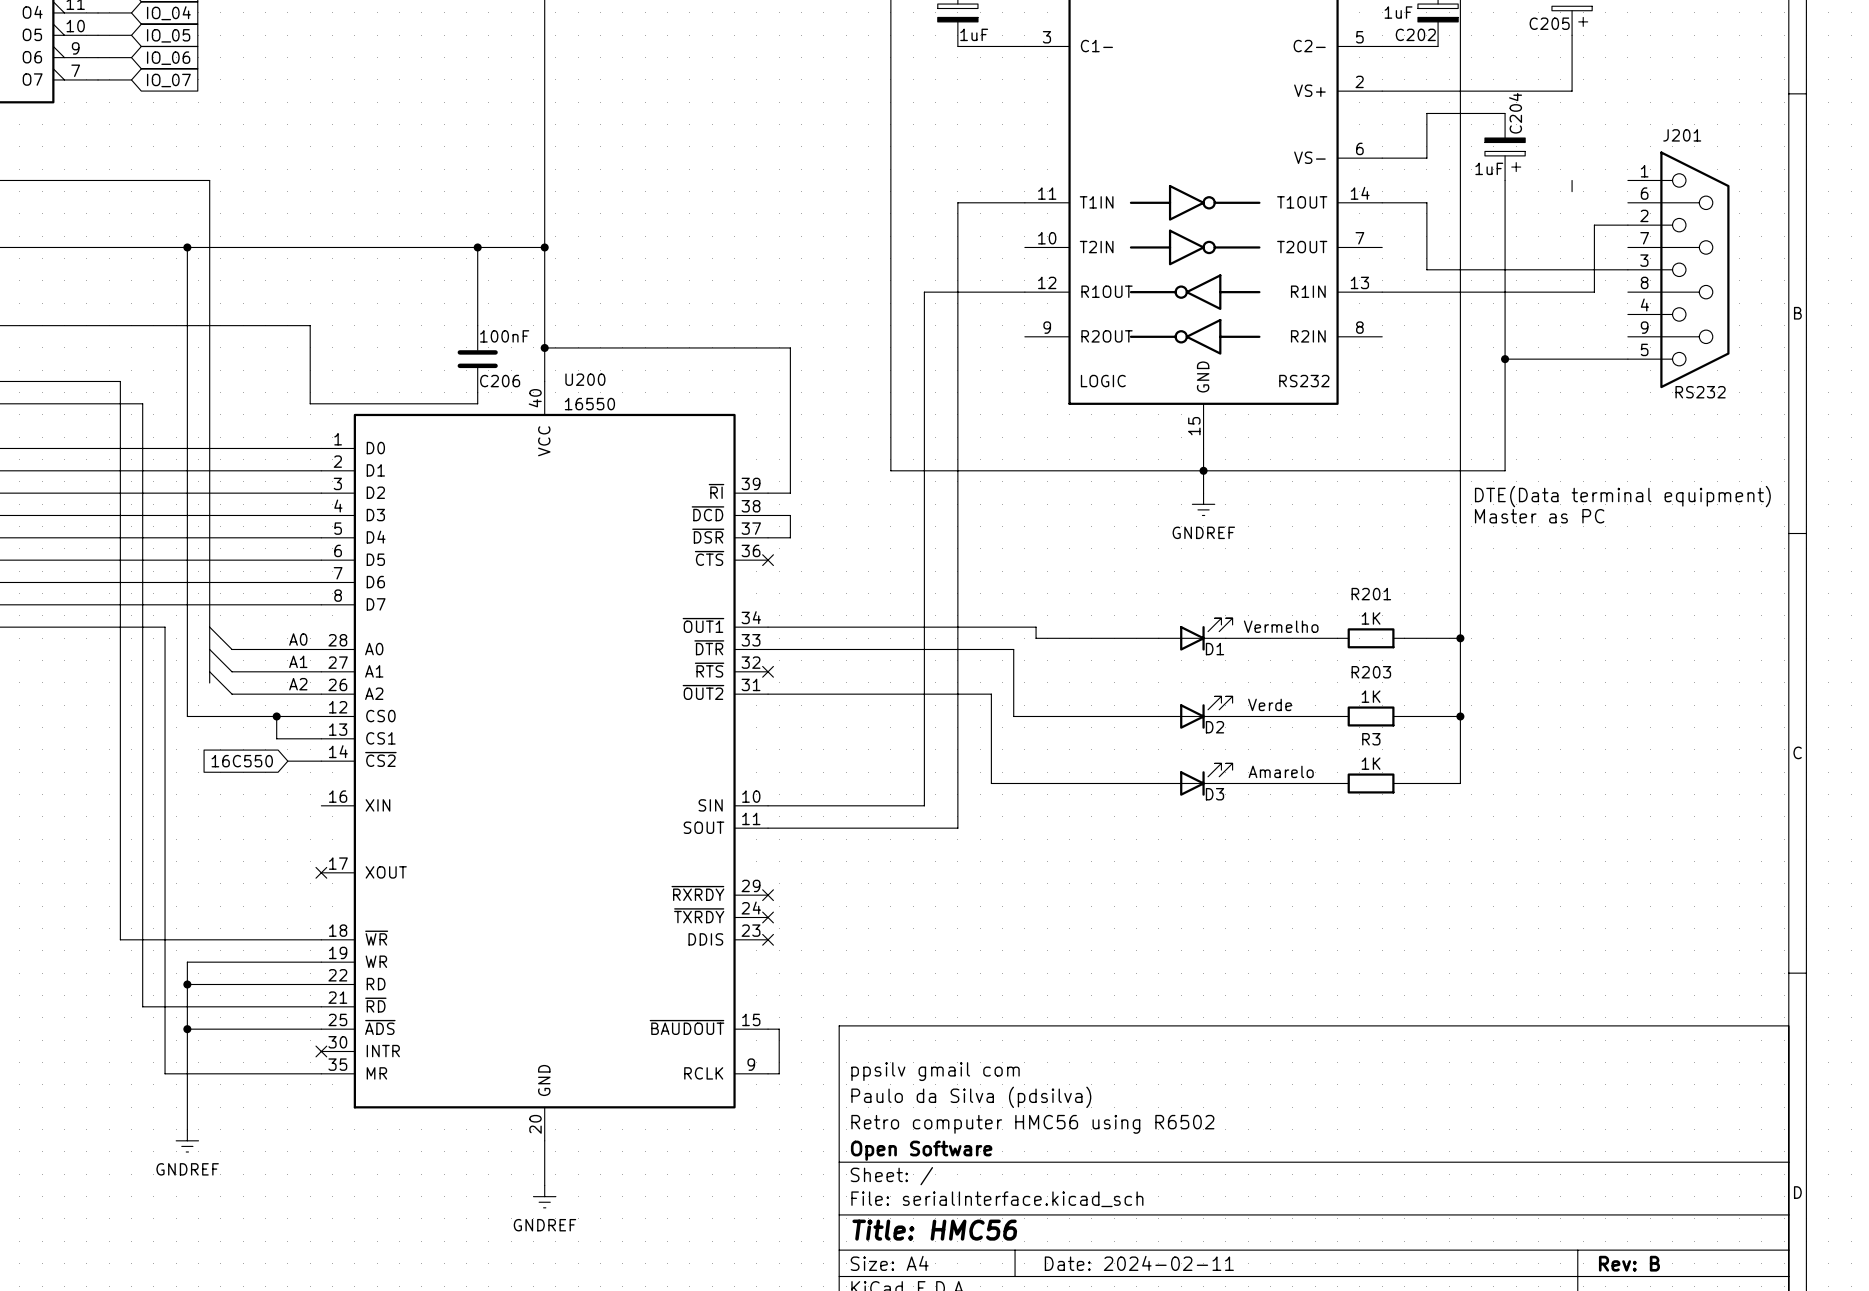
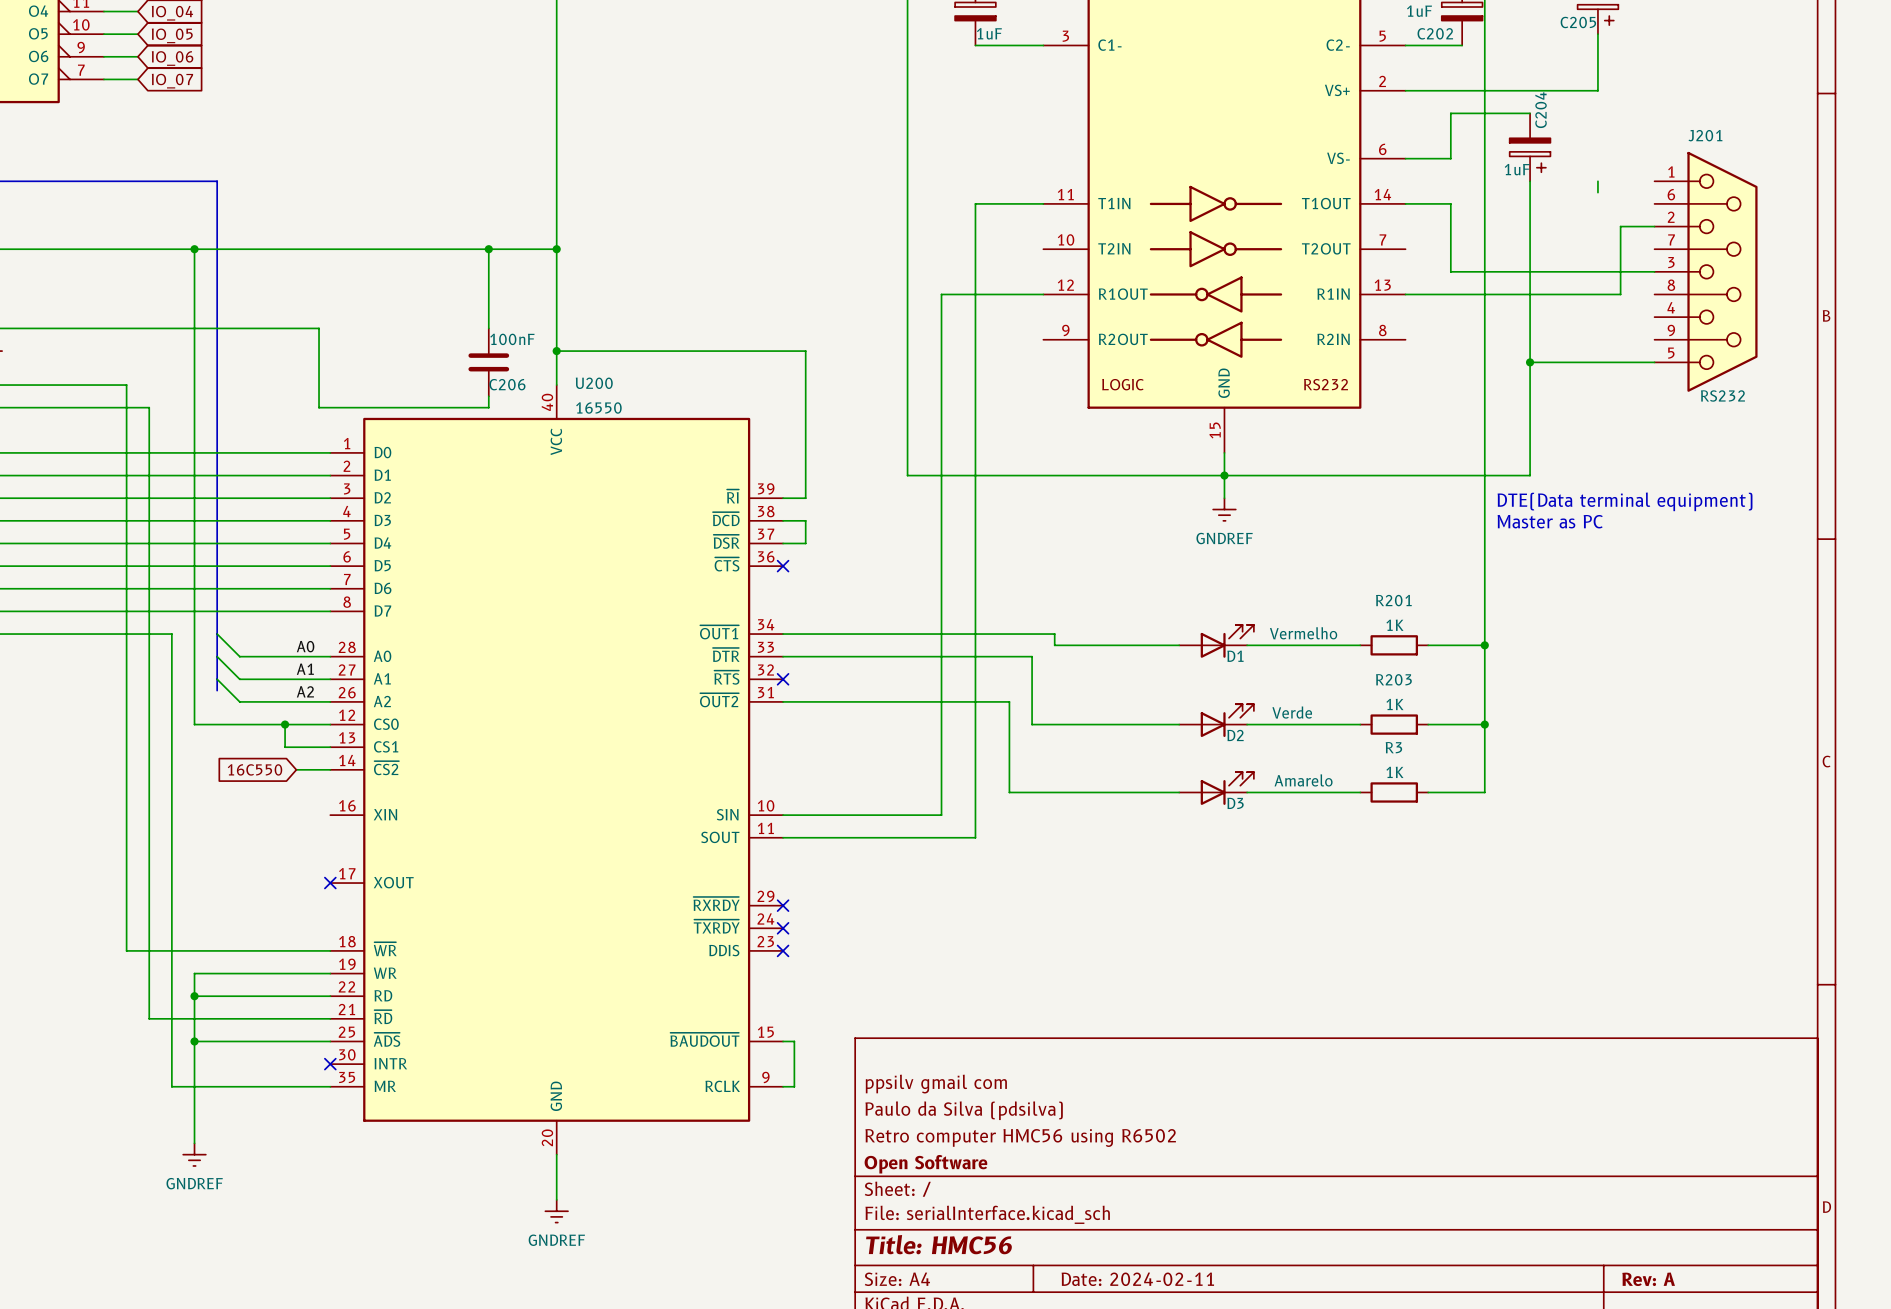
title block: Rev: B (1629, 1263) -> Rev: A (1648, 1279)

